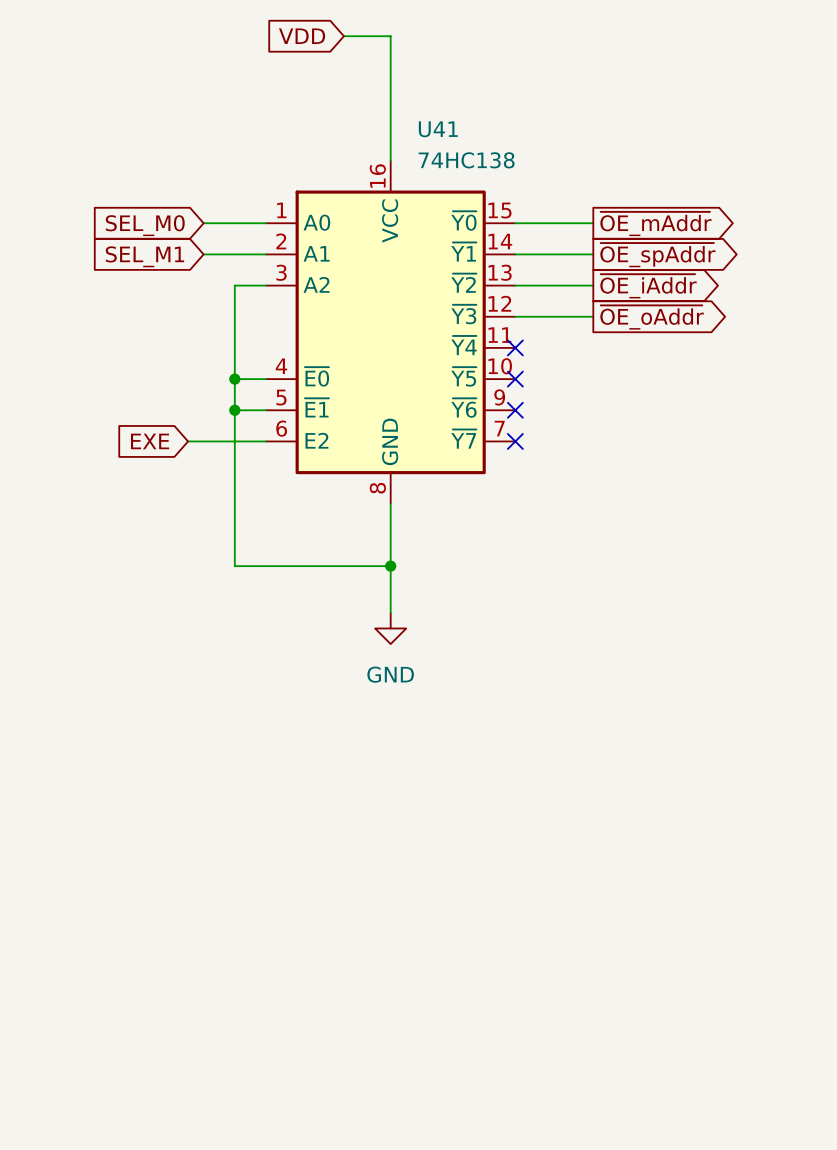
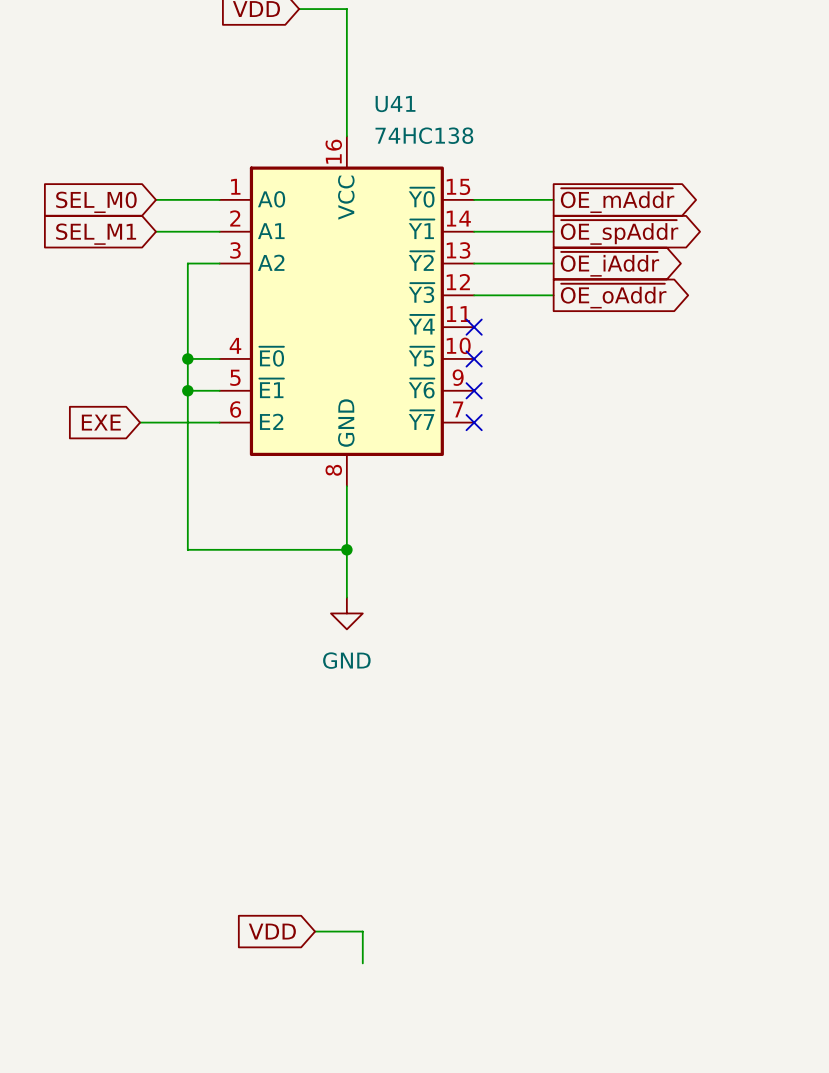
global label: none -> VDD (272, 931)
wire: none -> (315, 931) (362, 931) (362, 963)

